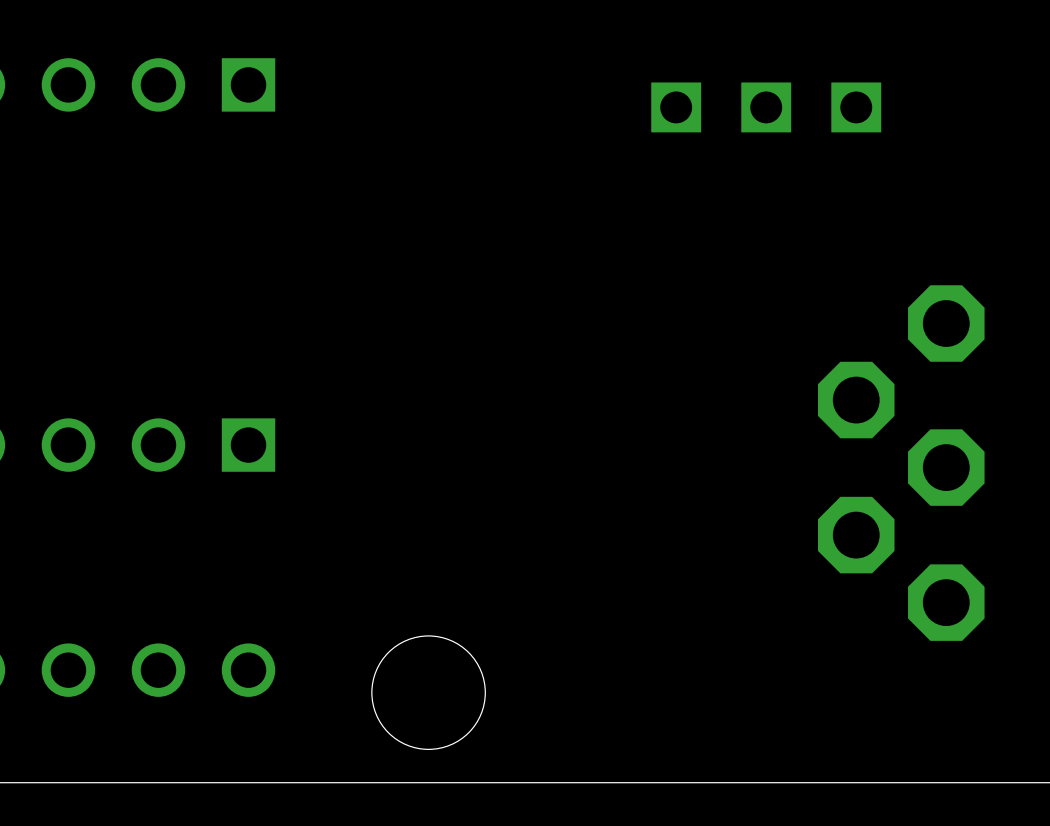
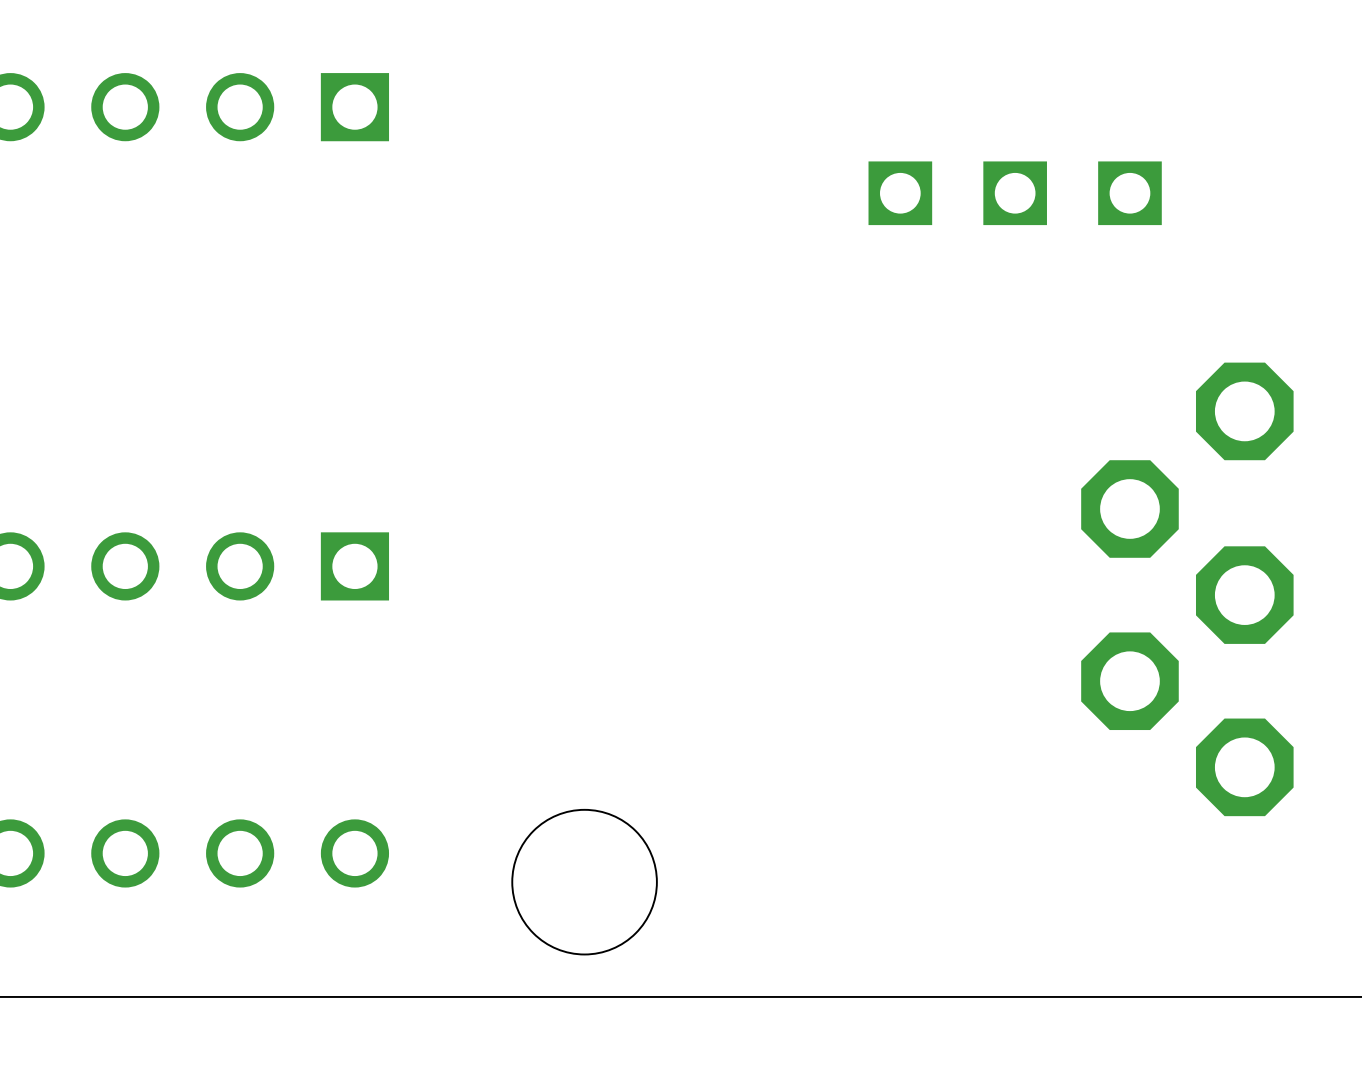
part position: (766, 107) -> (1015, 193)

